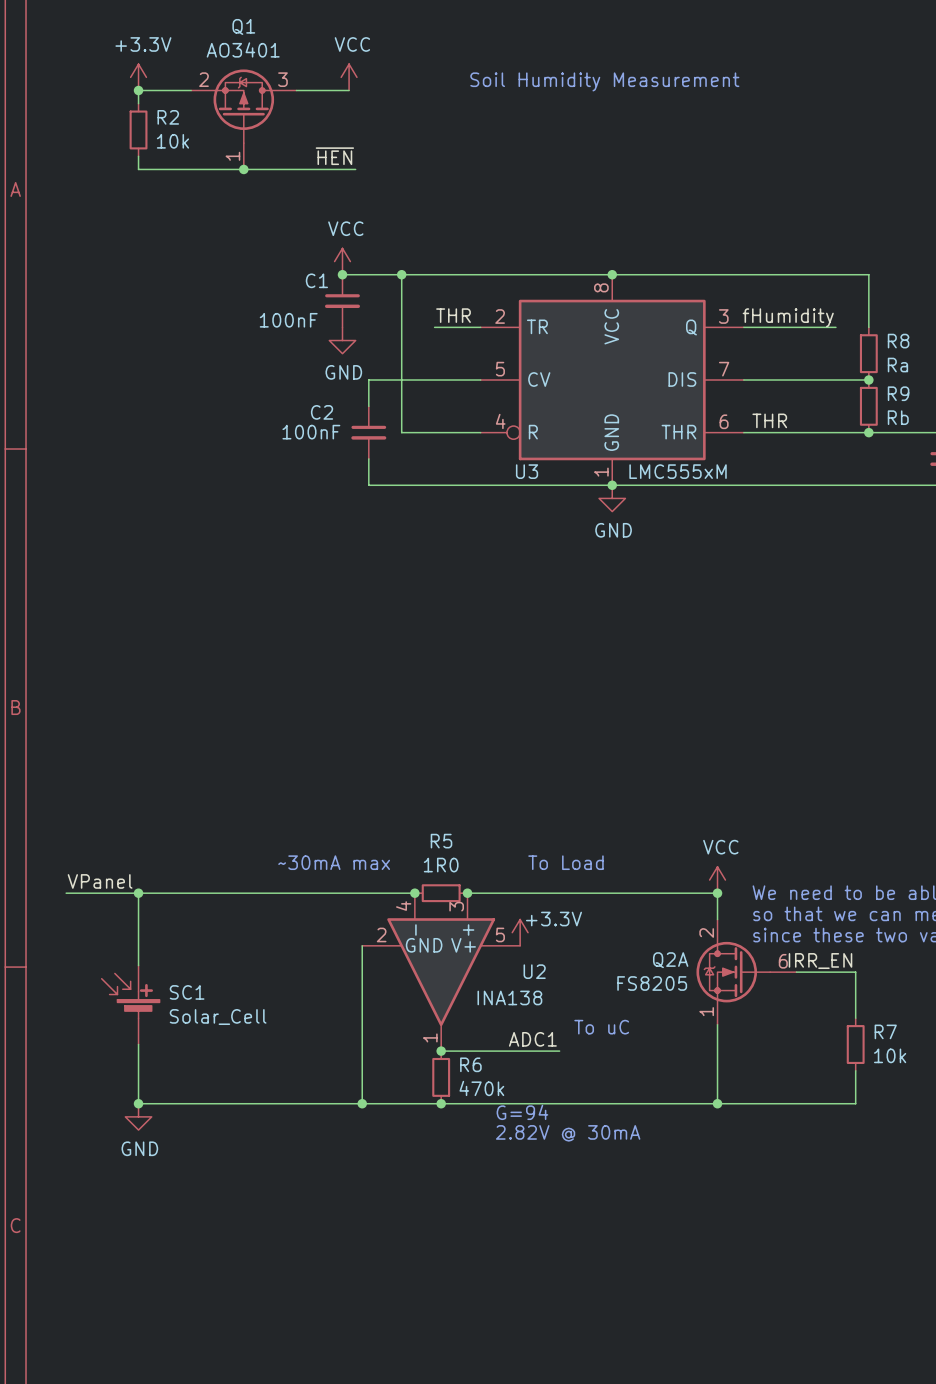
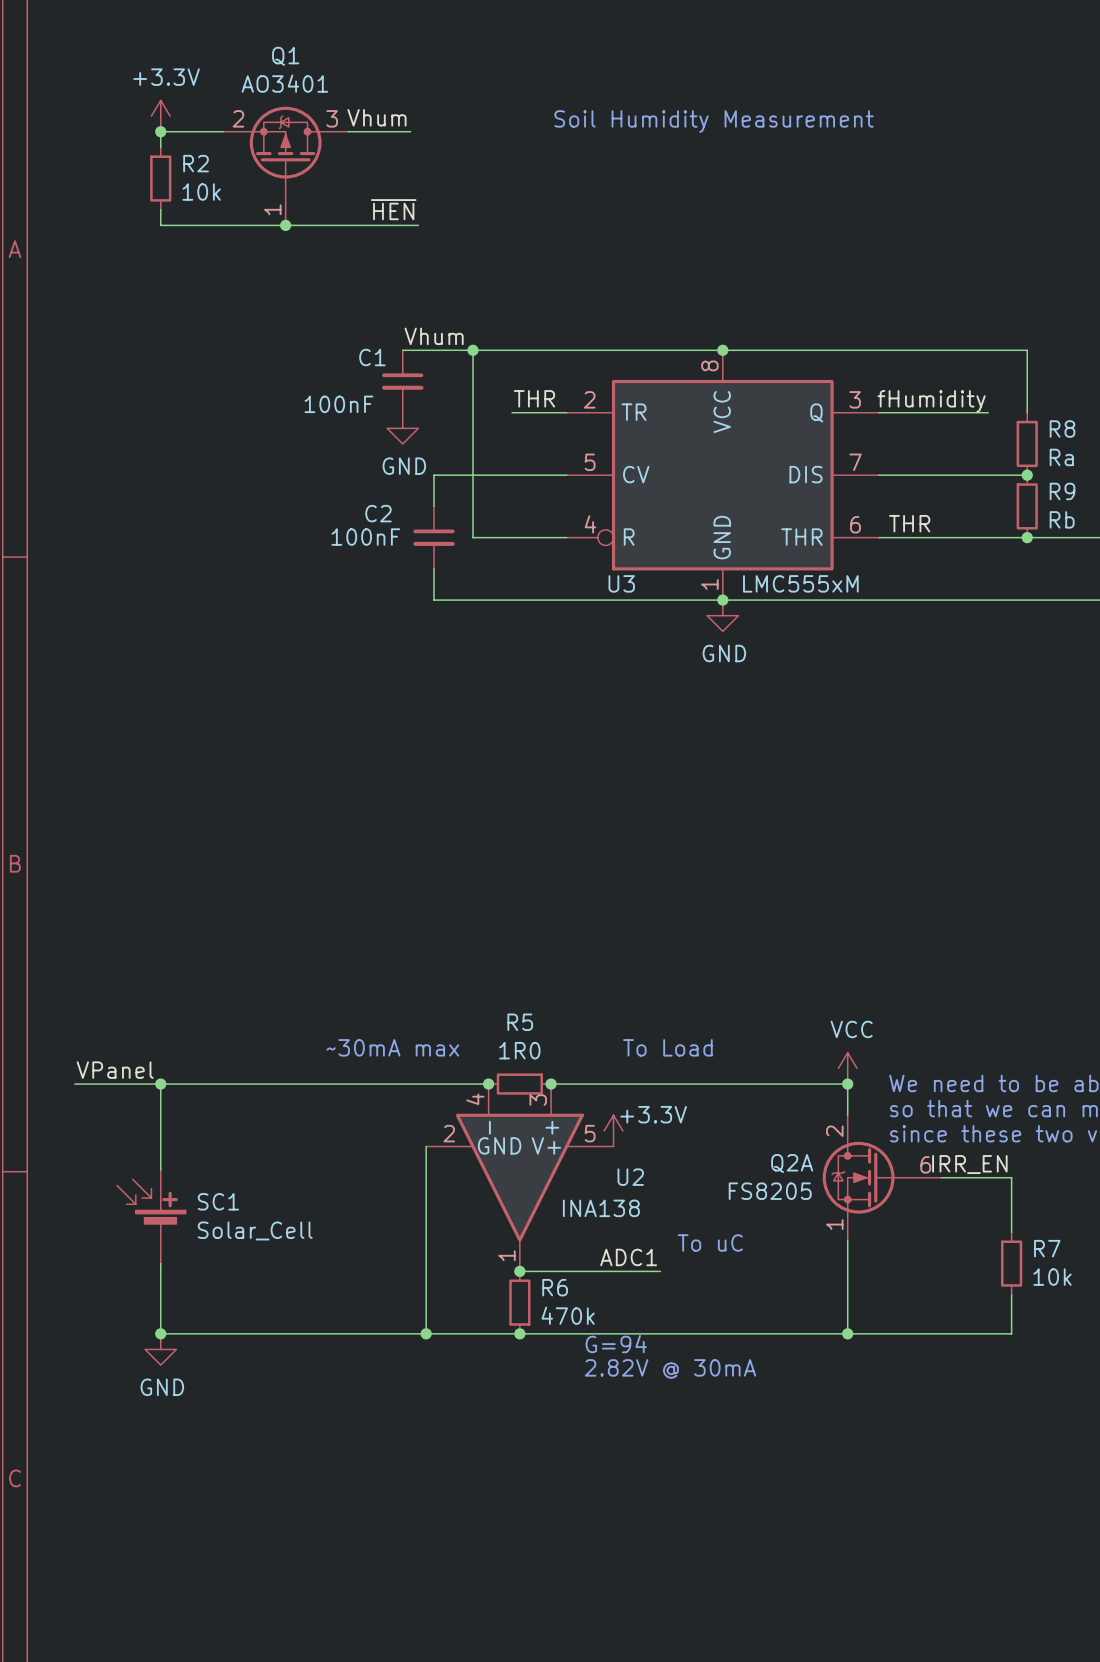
power symbol: VCC (349, 77) -> none
label: none -> Vhum (376, 117)
power symbol: VCC (342, 261) -> none
label: none -> Vhum (434, 336)
junction: (342, 274) -> none

